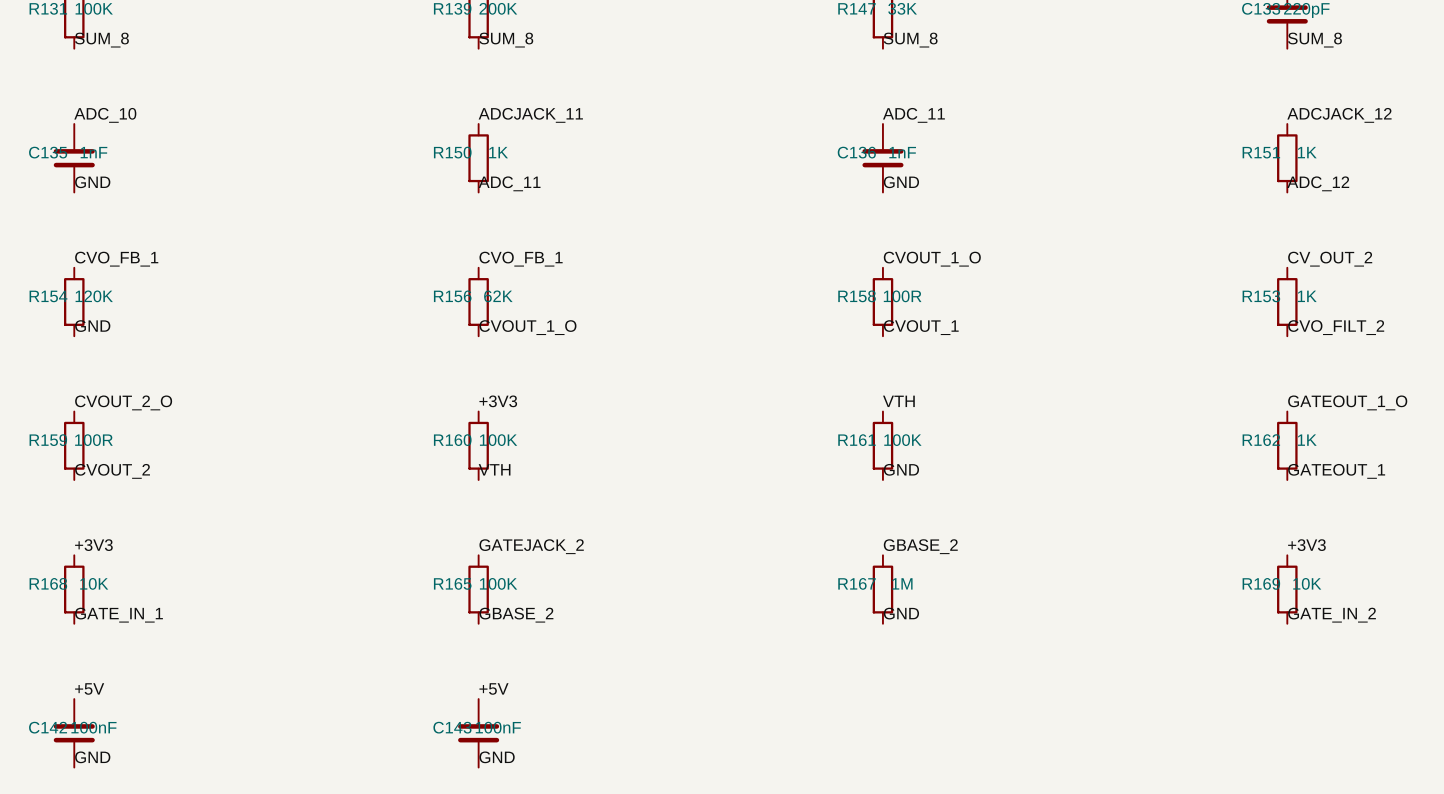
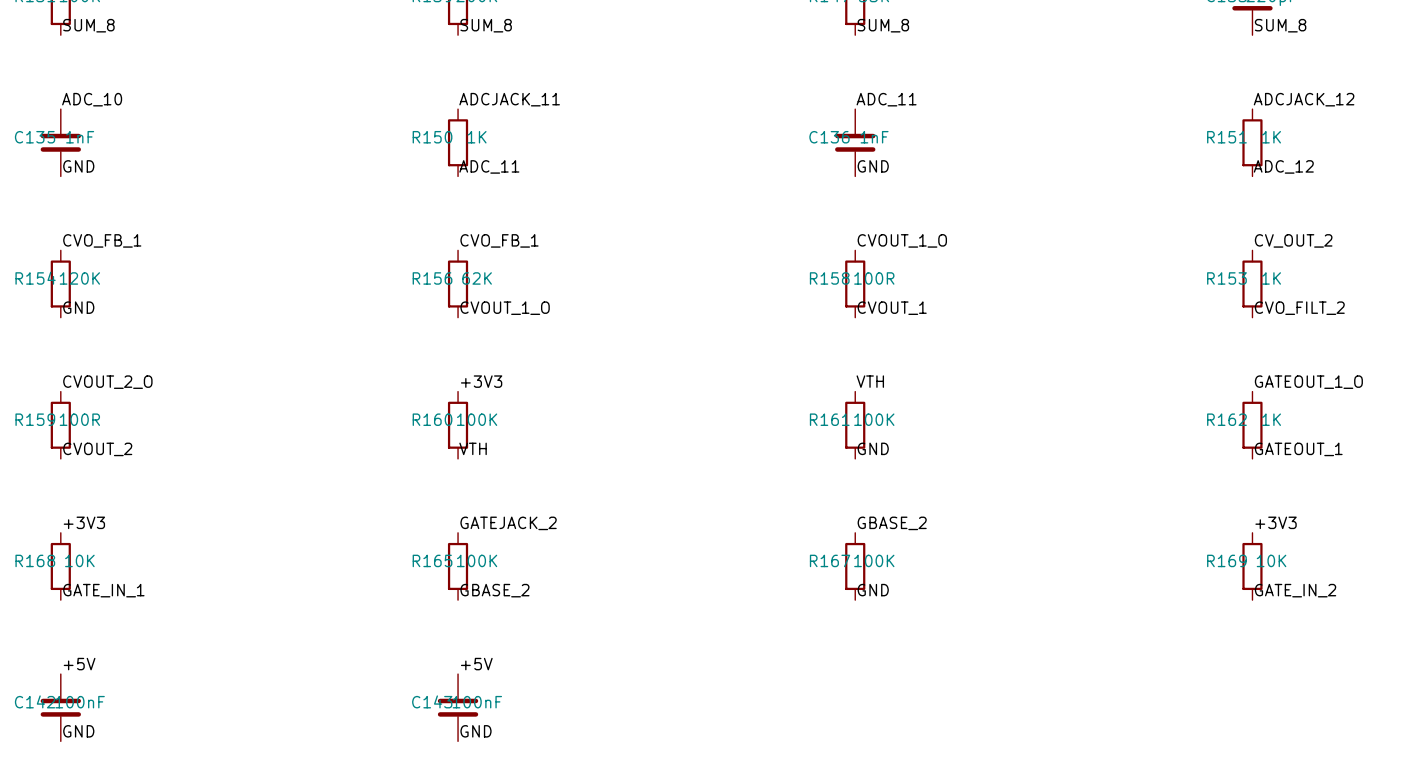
R167 value: 1M (902, 583) -> 100K (874, 560)

